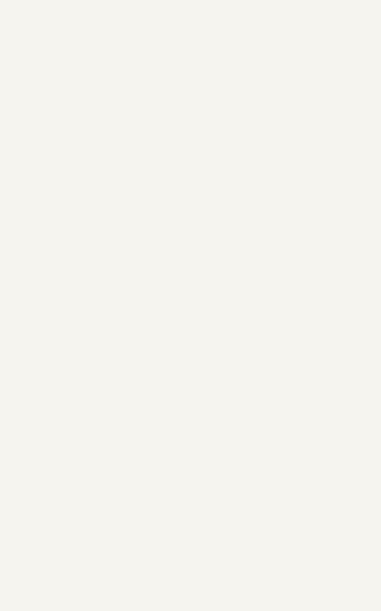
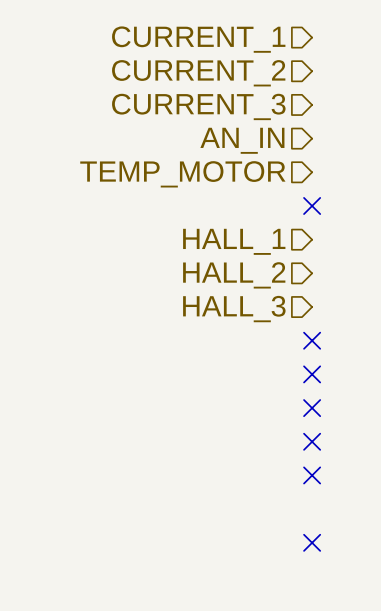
hierarchical label: none -> CURRENT_1 (198, 39)
hierarchical label: none -> CURRENT_2 (198, 73)
hierarchical label: none -> CURRENT_3 (198, 106)
hierarchical label: none -> AN_IN (242, 140)
hierarchical label: none -> TEMP_MOTOR (182, 174)
no-connect mark: none -> (312, 205)
hierarchical label: none -> HALL_1 (234, 241)
hierarchical label: none -> HALL_2 (234, 275)
hierarchical label: none -> HALL_3 (234, 309)
no-connect mark: none -> (312, 340)
no-connect mark: none -> (312, 374)
no-connect mark: none -> (312, 408)
no-connect mark: none -> (312, 441)
no-connect mark: none -> (312, 475)
no-connect mark: none -> (312, 542)

